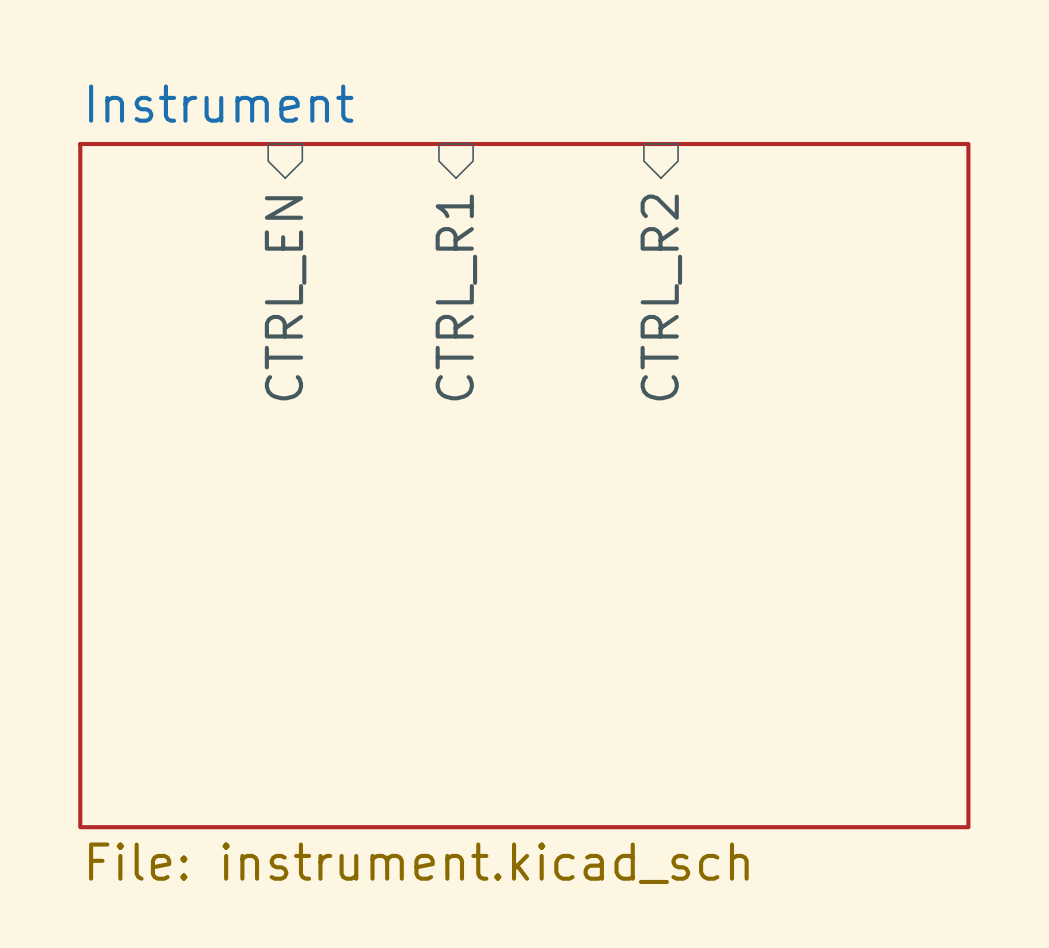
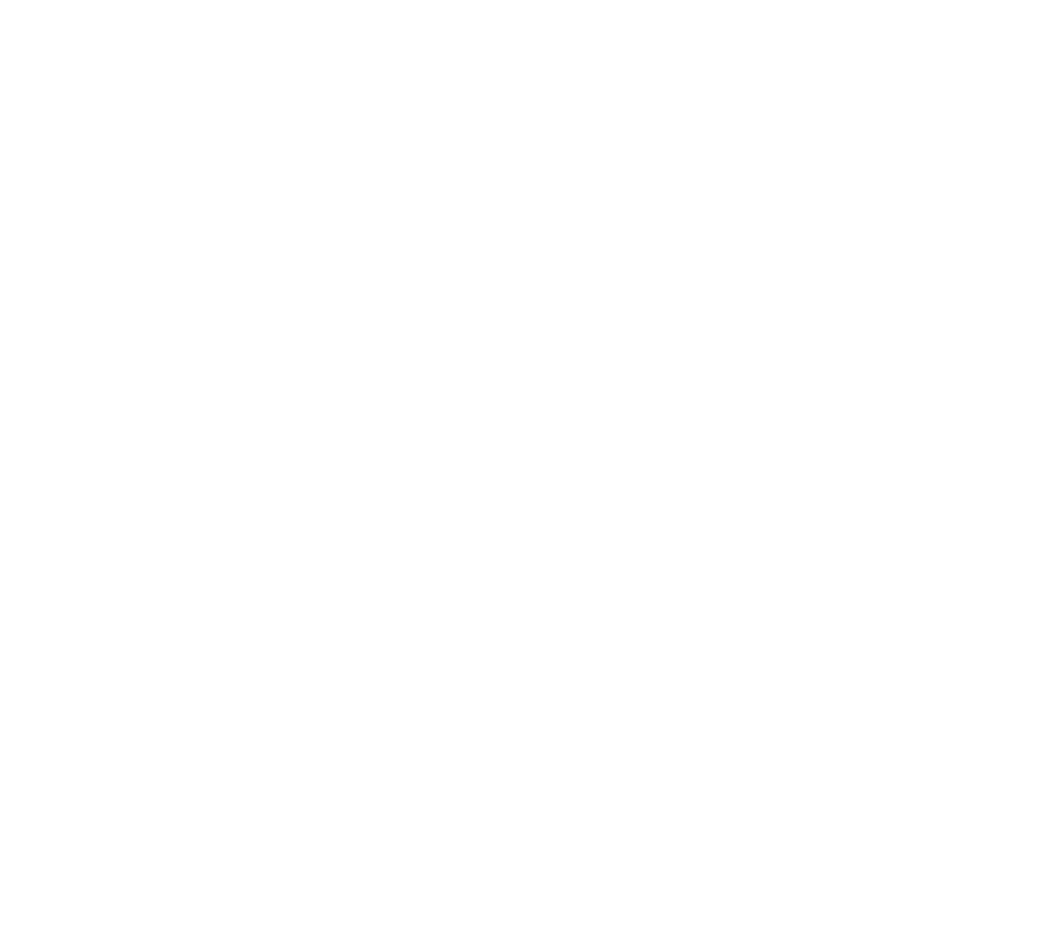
sheet pin: CTRL_R1 (456, 297) -> none
sheet pin: CTRL_R2 (661, 297) -> none
sheet pin: CTRL_EN (285, 298) -> none
sheet Instrument: File: instrument.kicad_sch (524, 485) -> none

